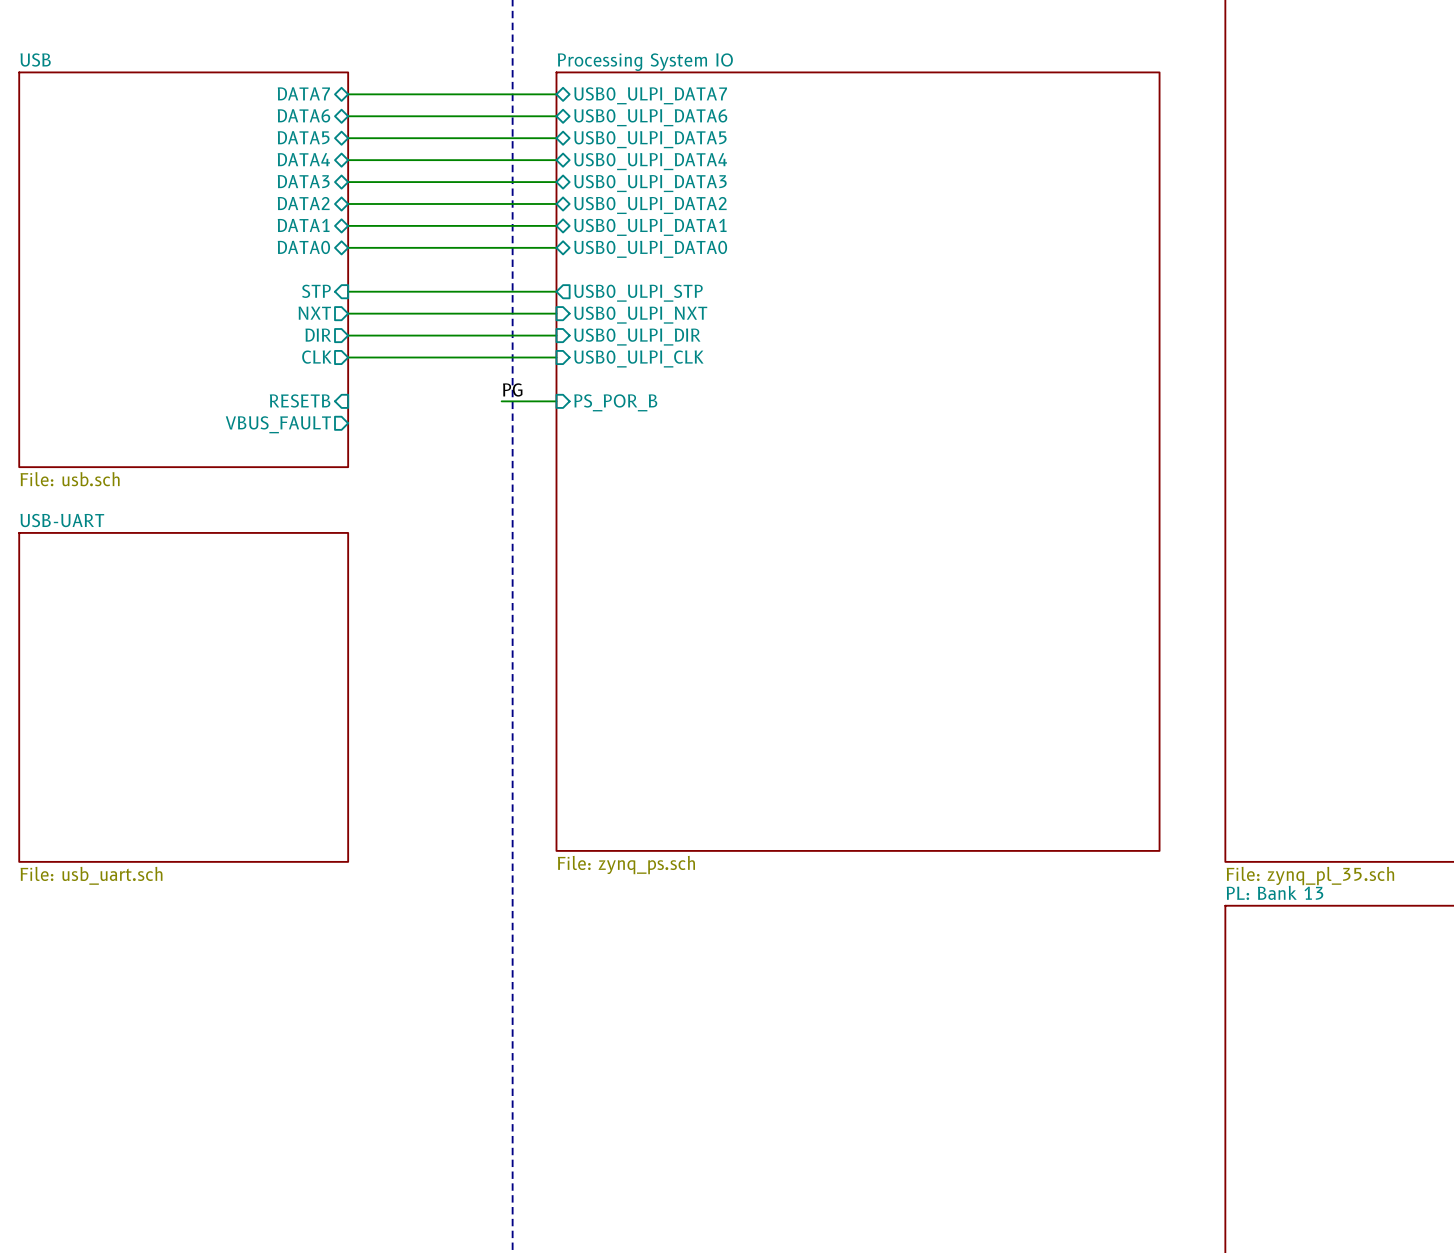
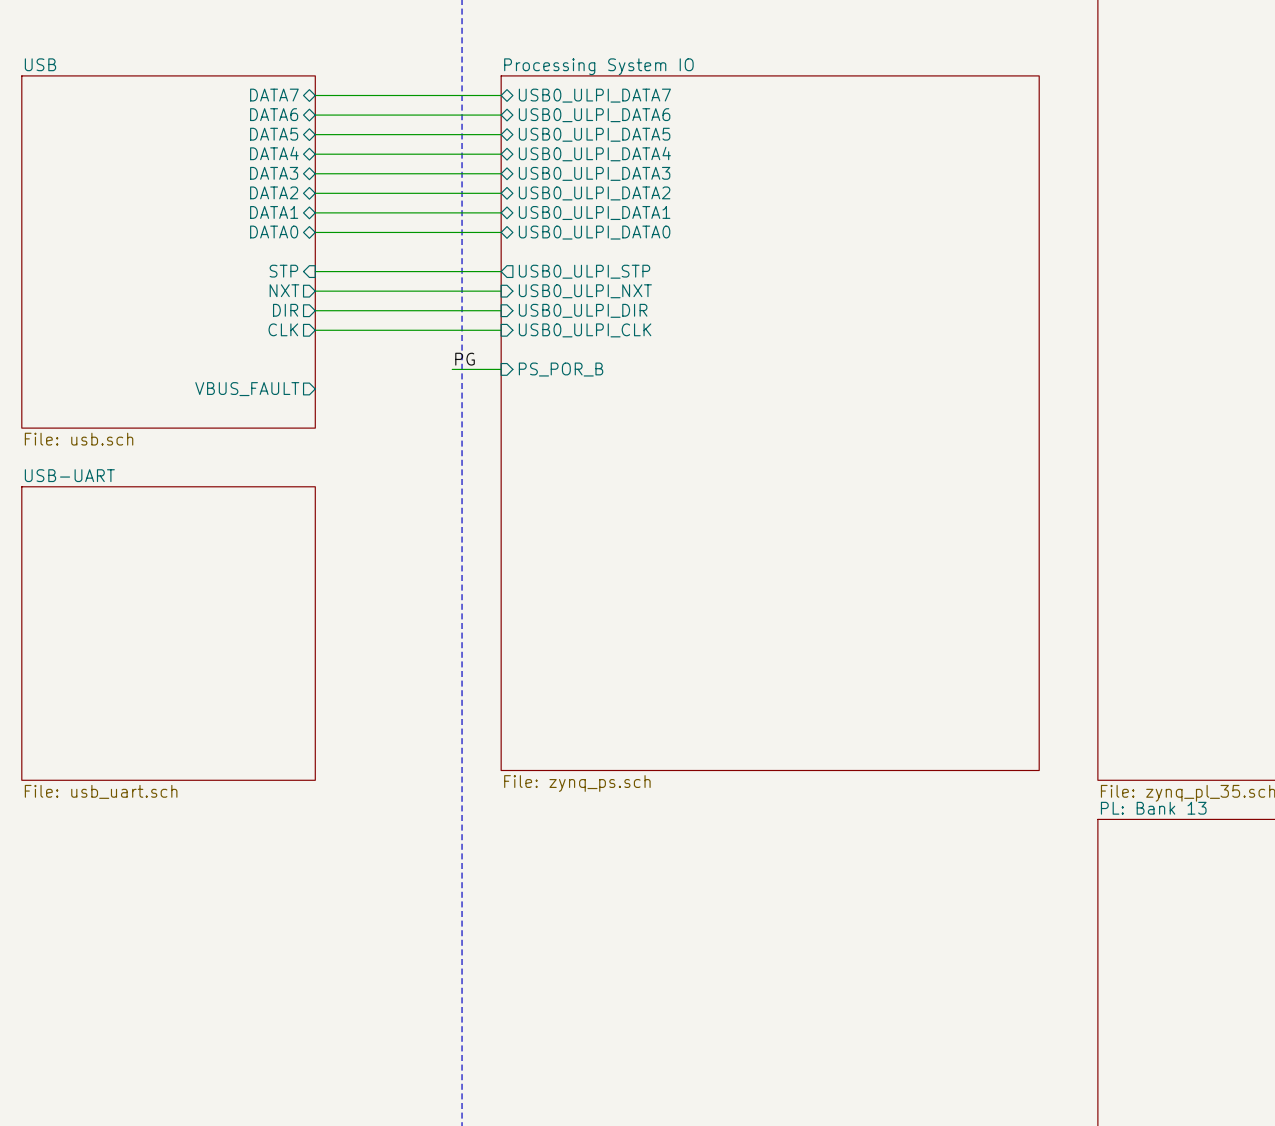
sheet pin: RESETB (300, 400) -> none

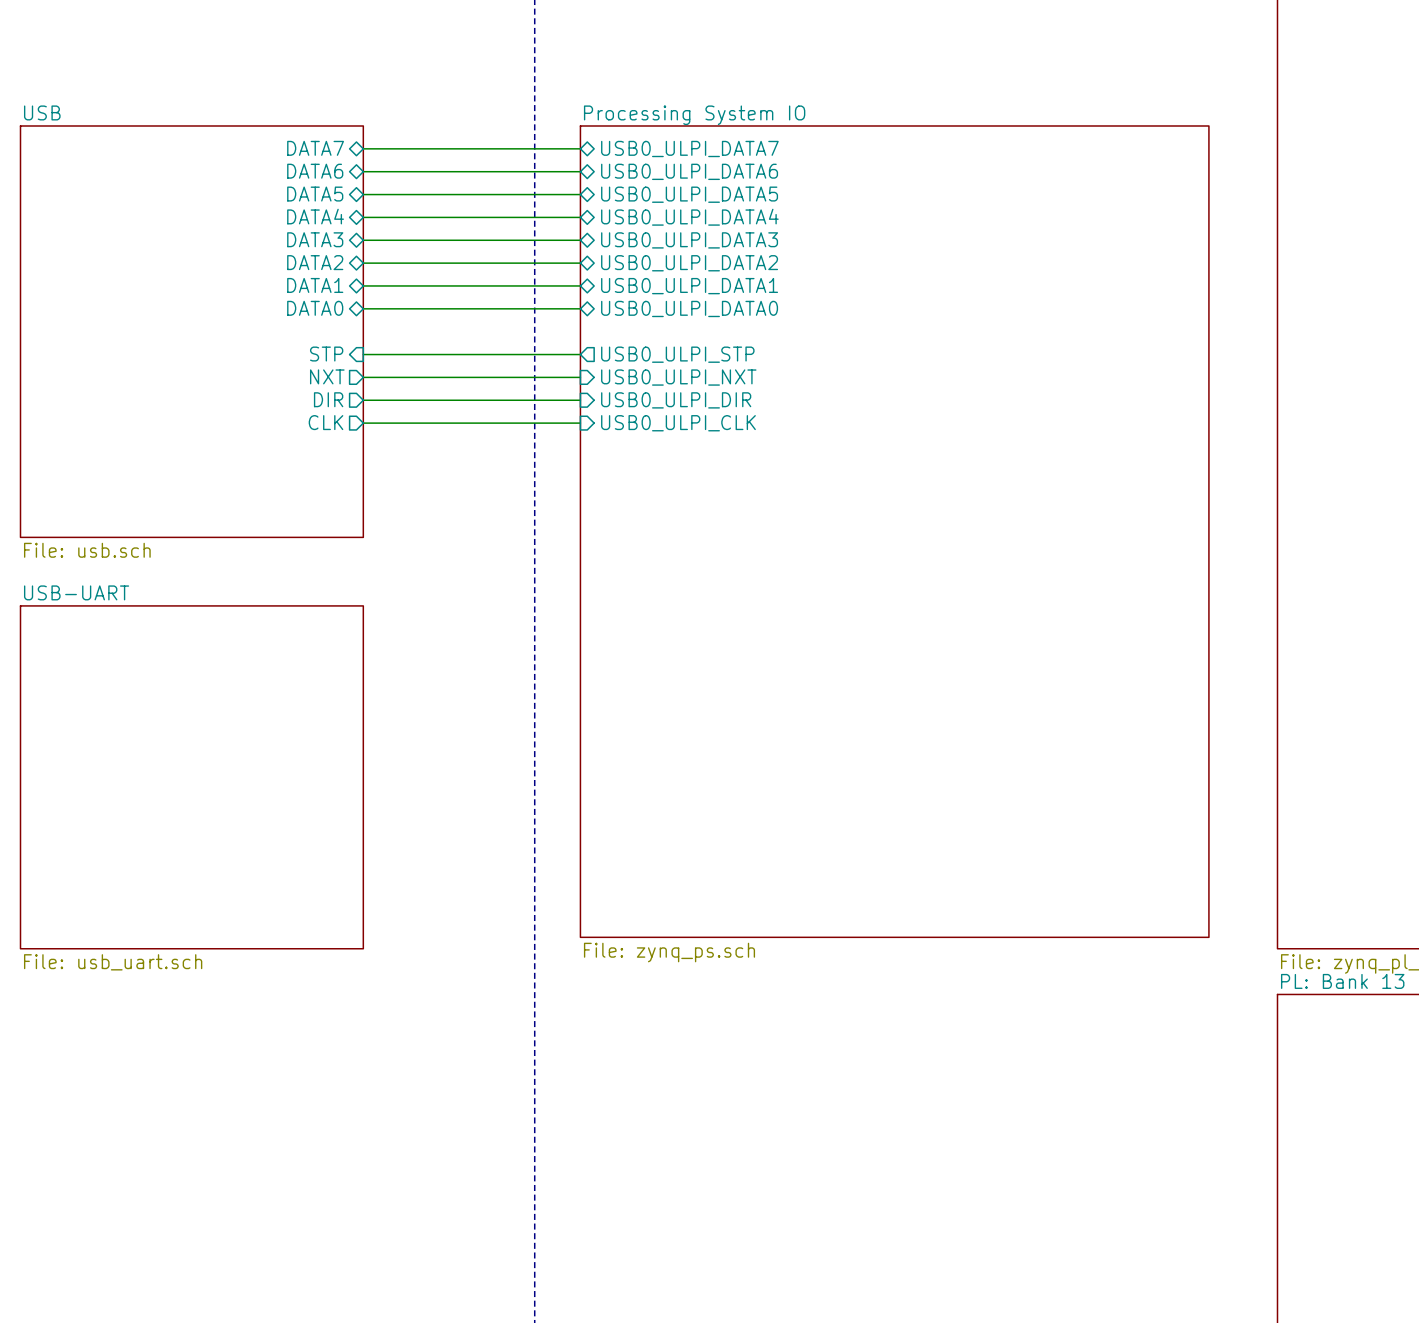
label: PG (465, 359) -> none
wire: (452, 369) (501, 369) -> none
sheet pin: PS_POR_B (561, 369) -> none
sheet pin: VBUS_FAULT (247, 389) -> none

